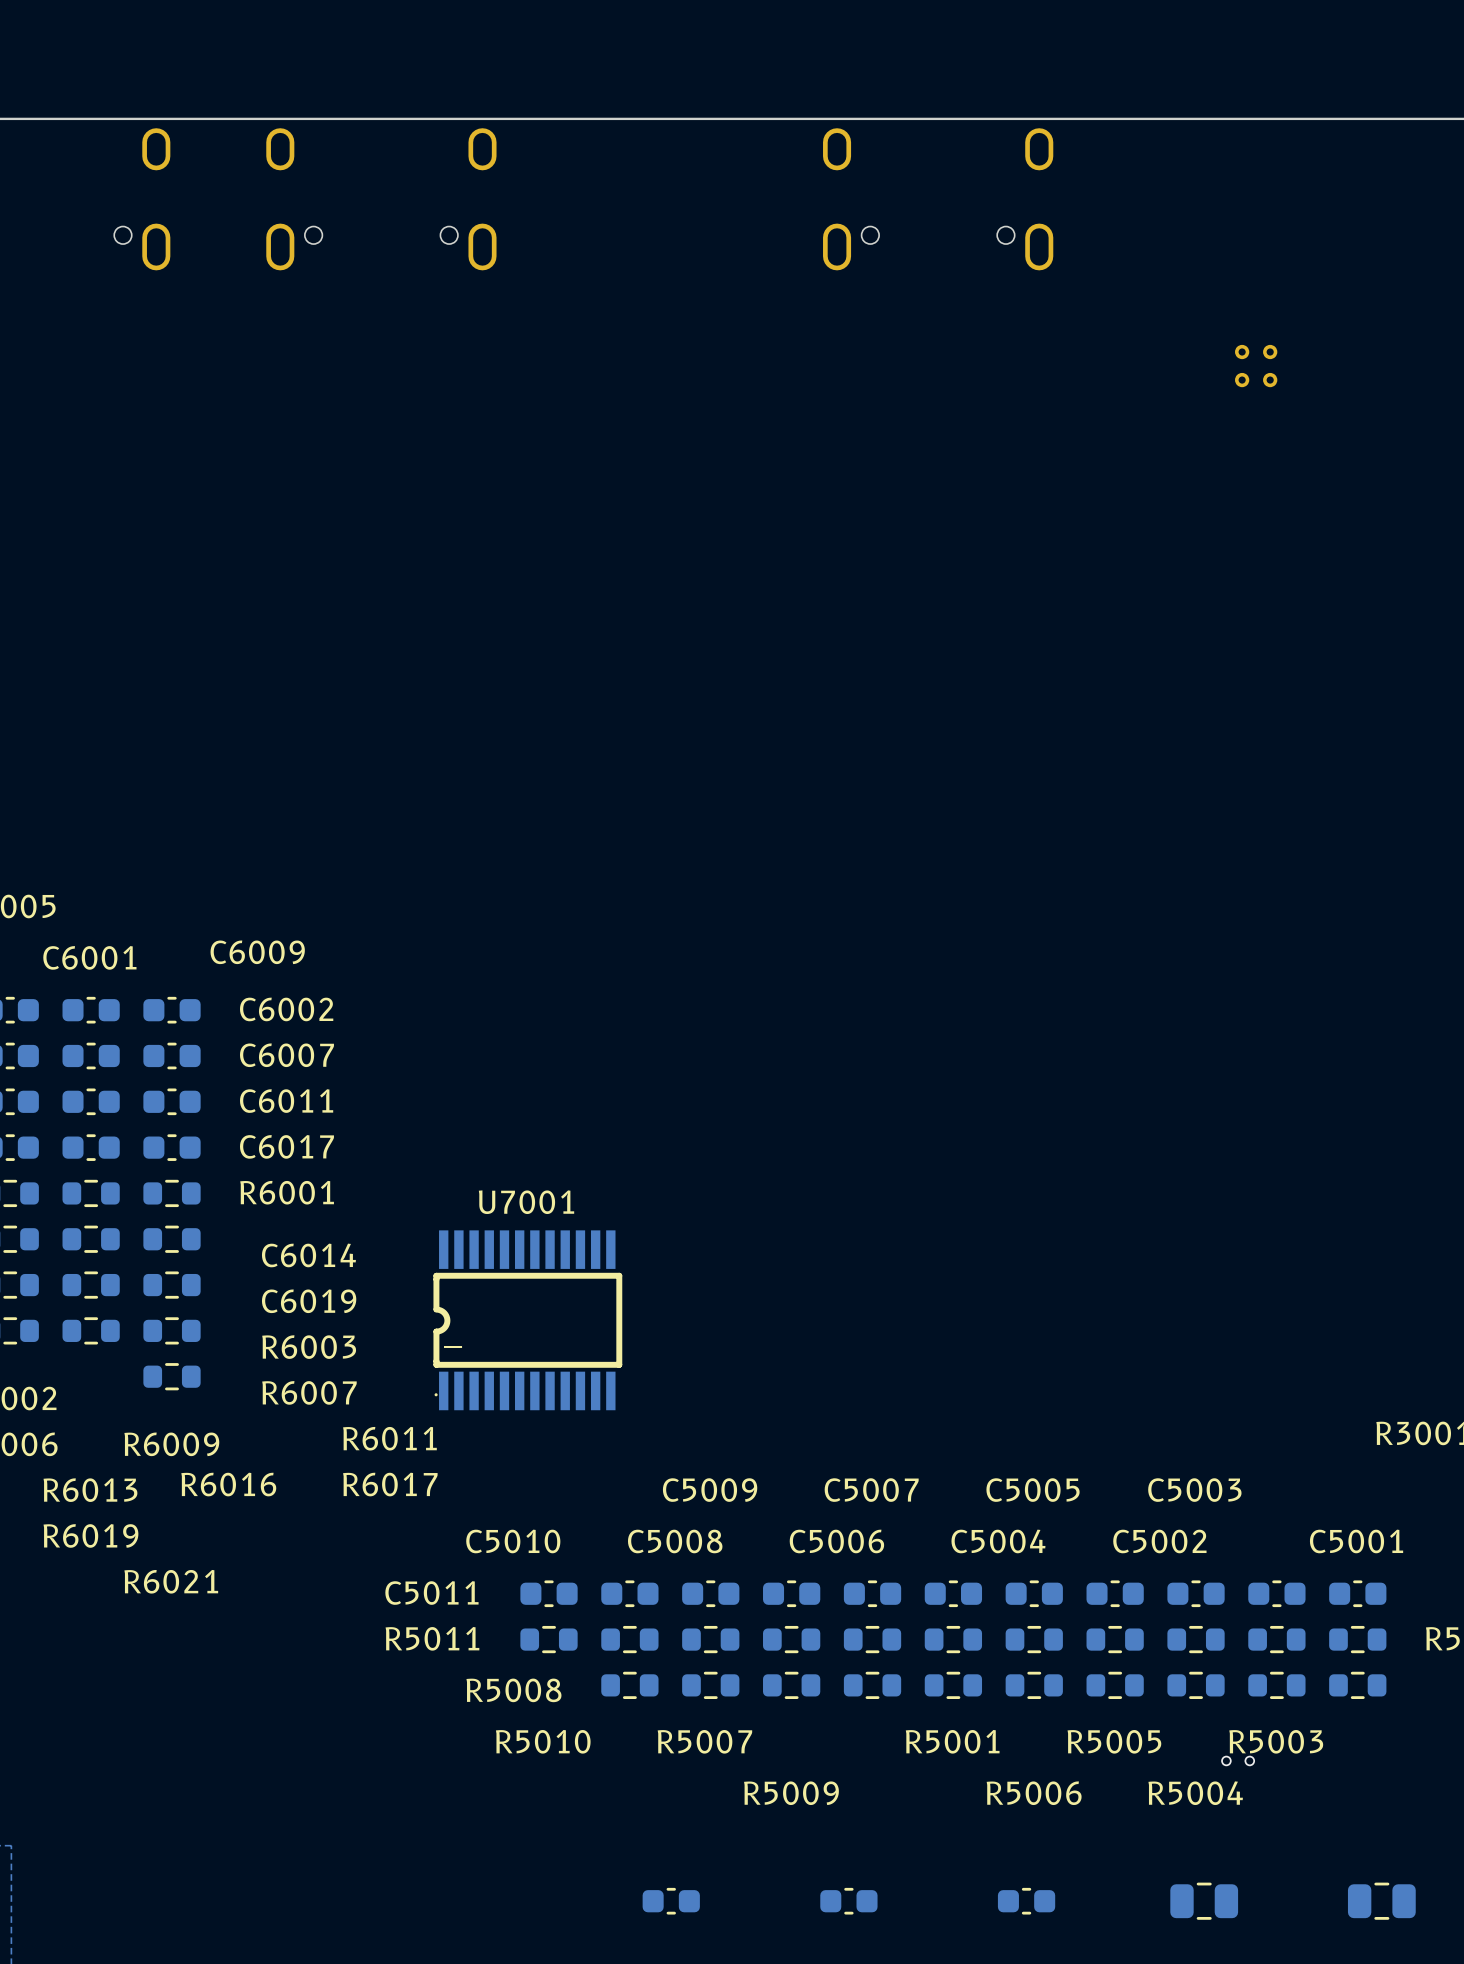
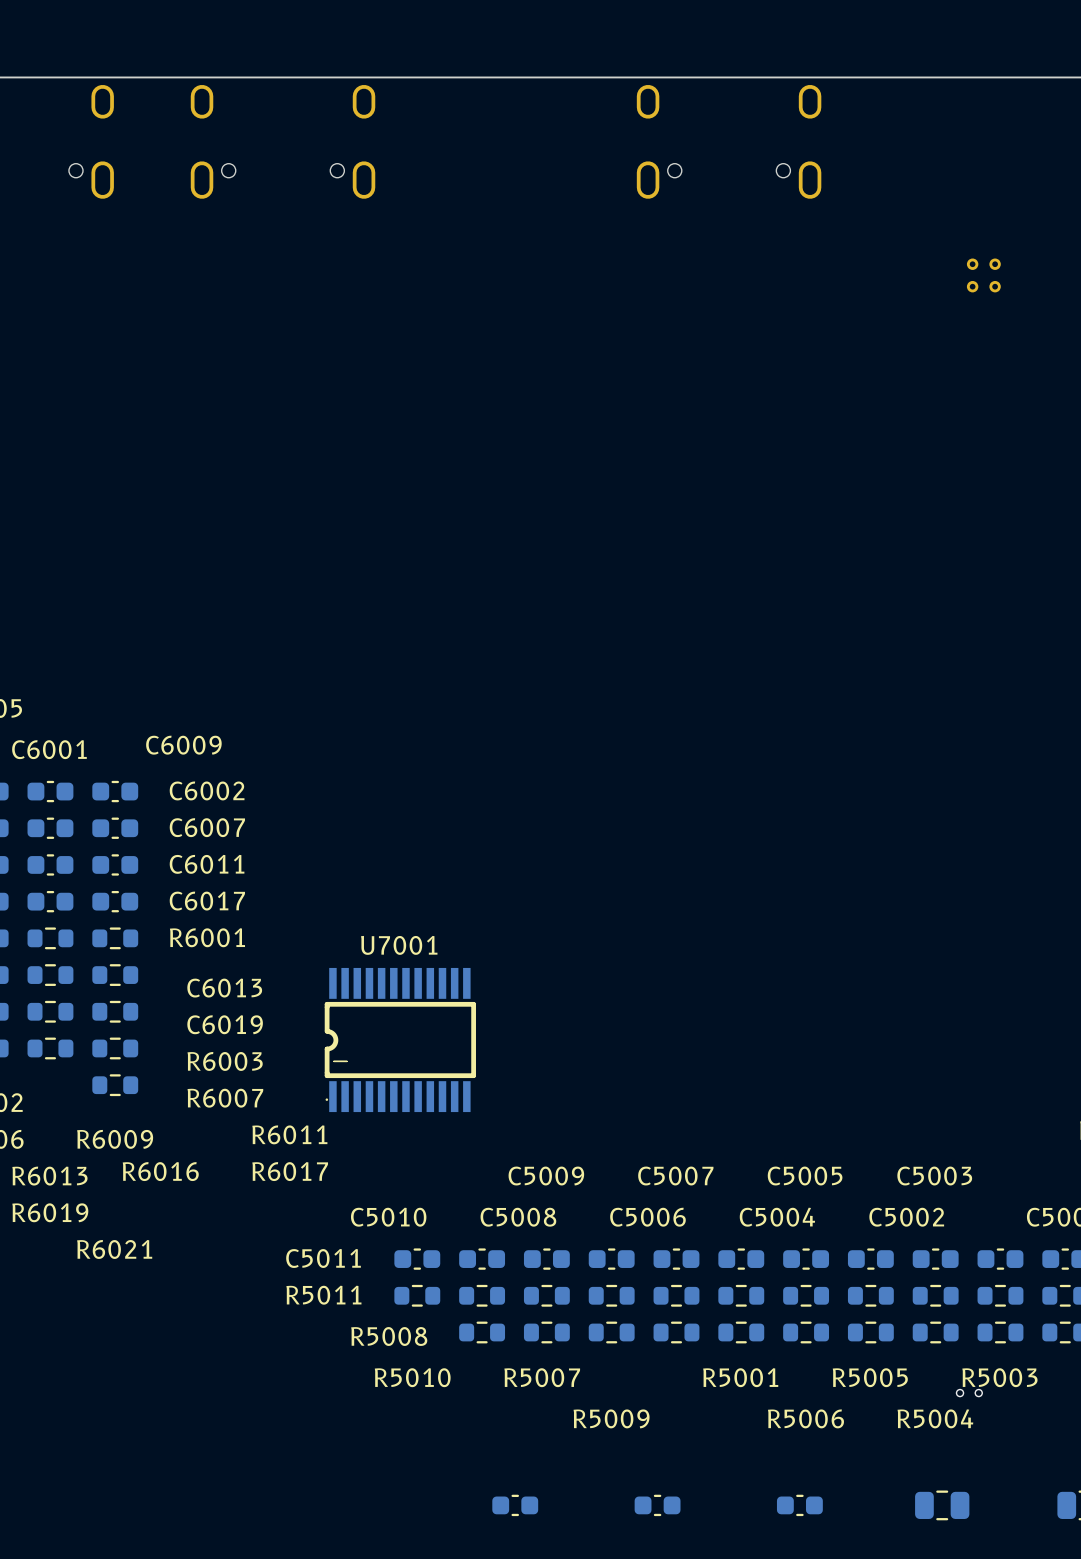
C6014 name: C6014 (308, 1255) -> C6013 (224, 988)

